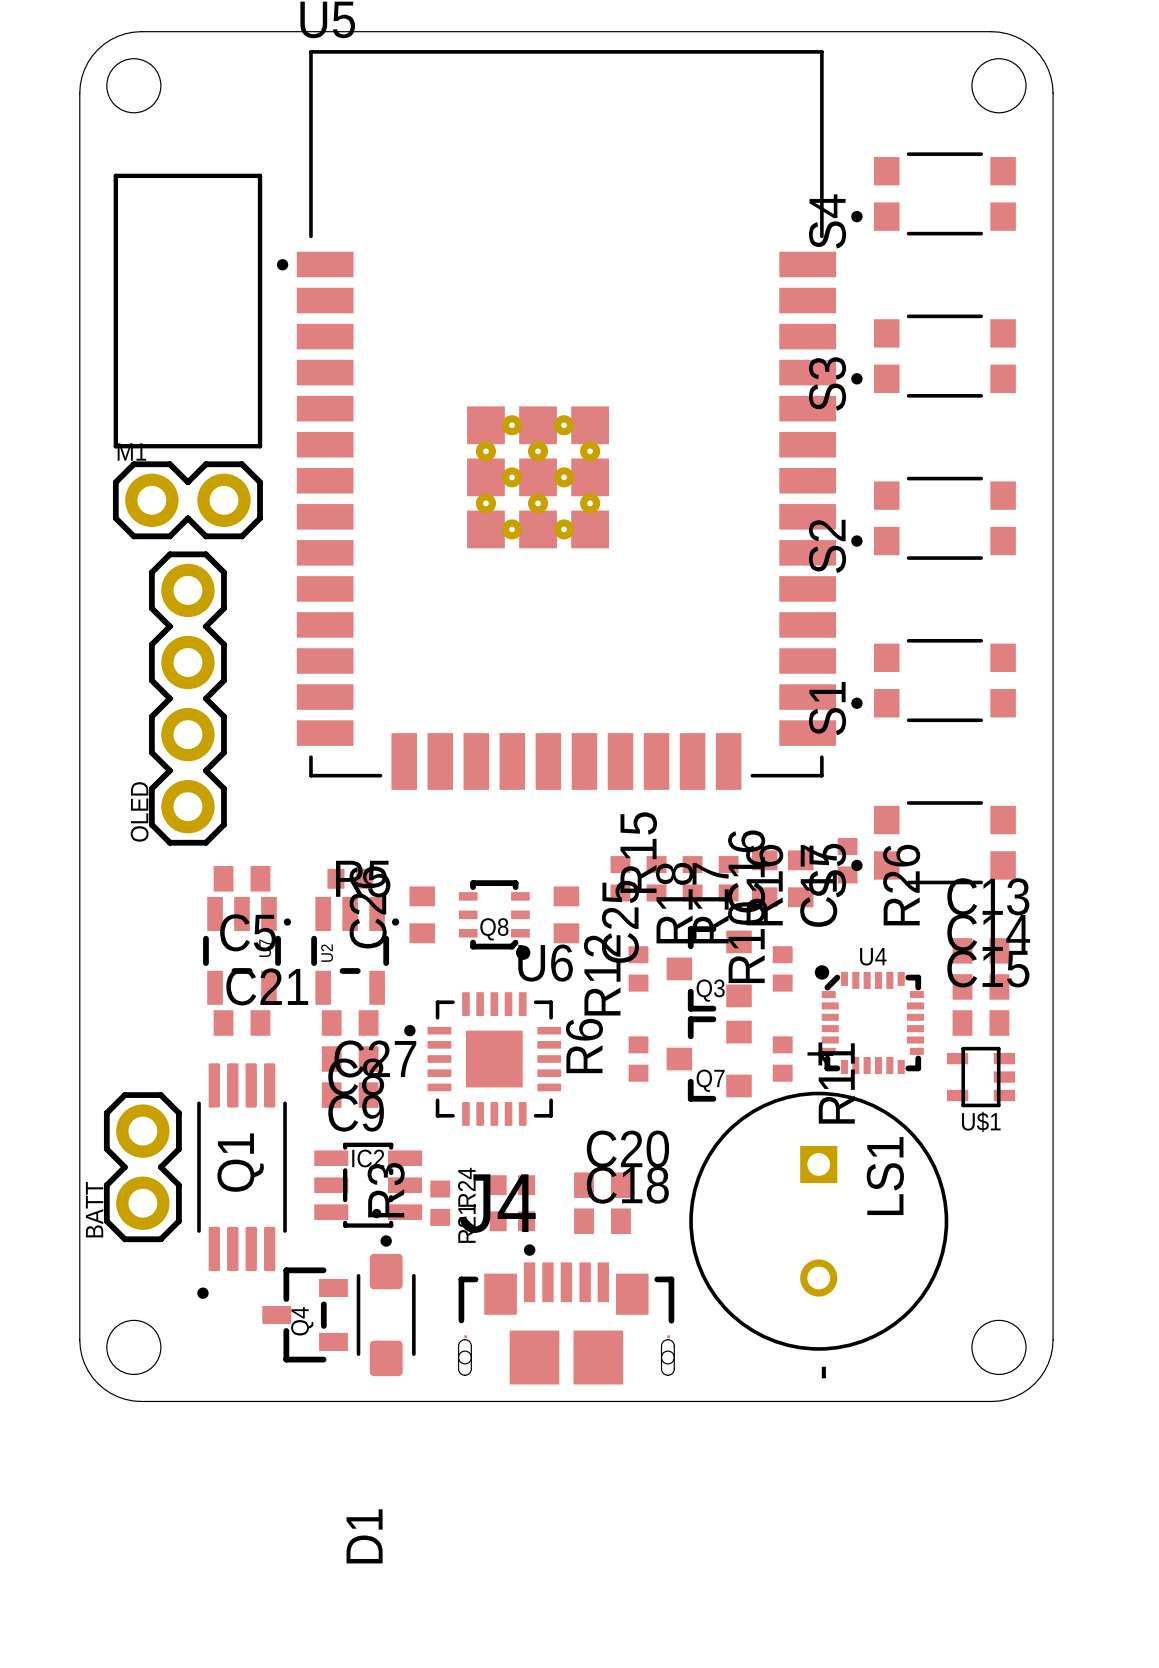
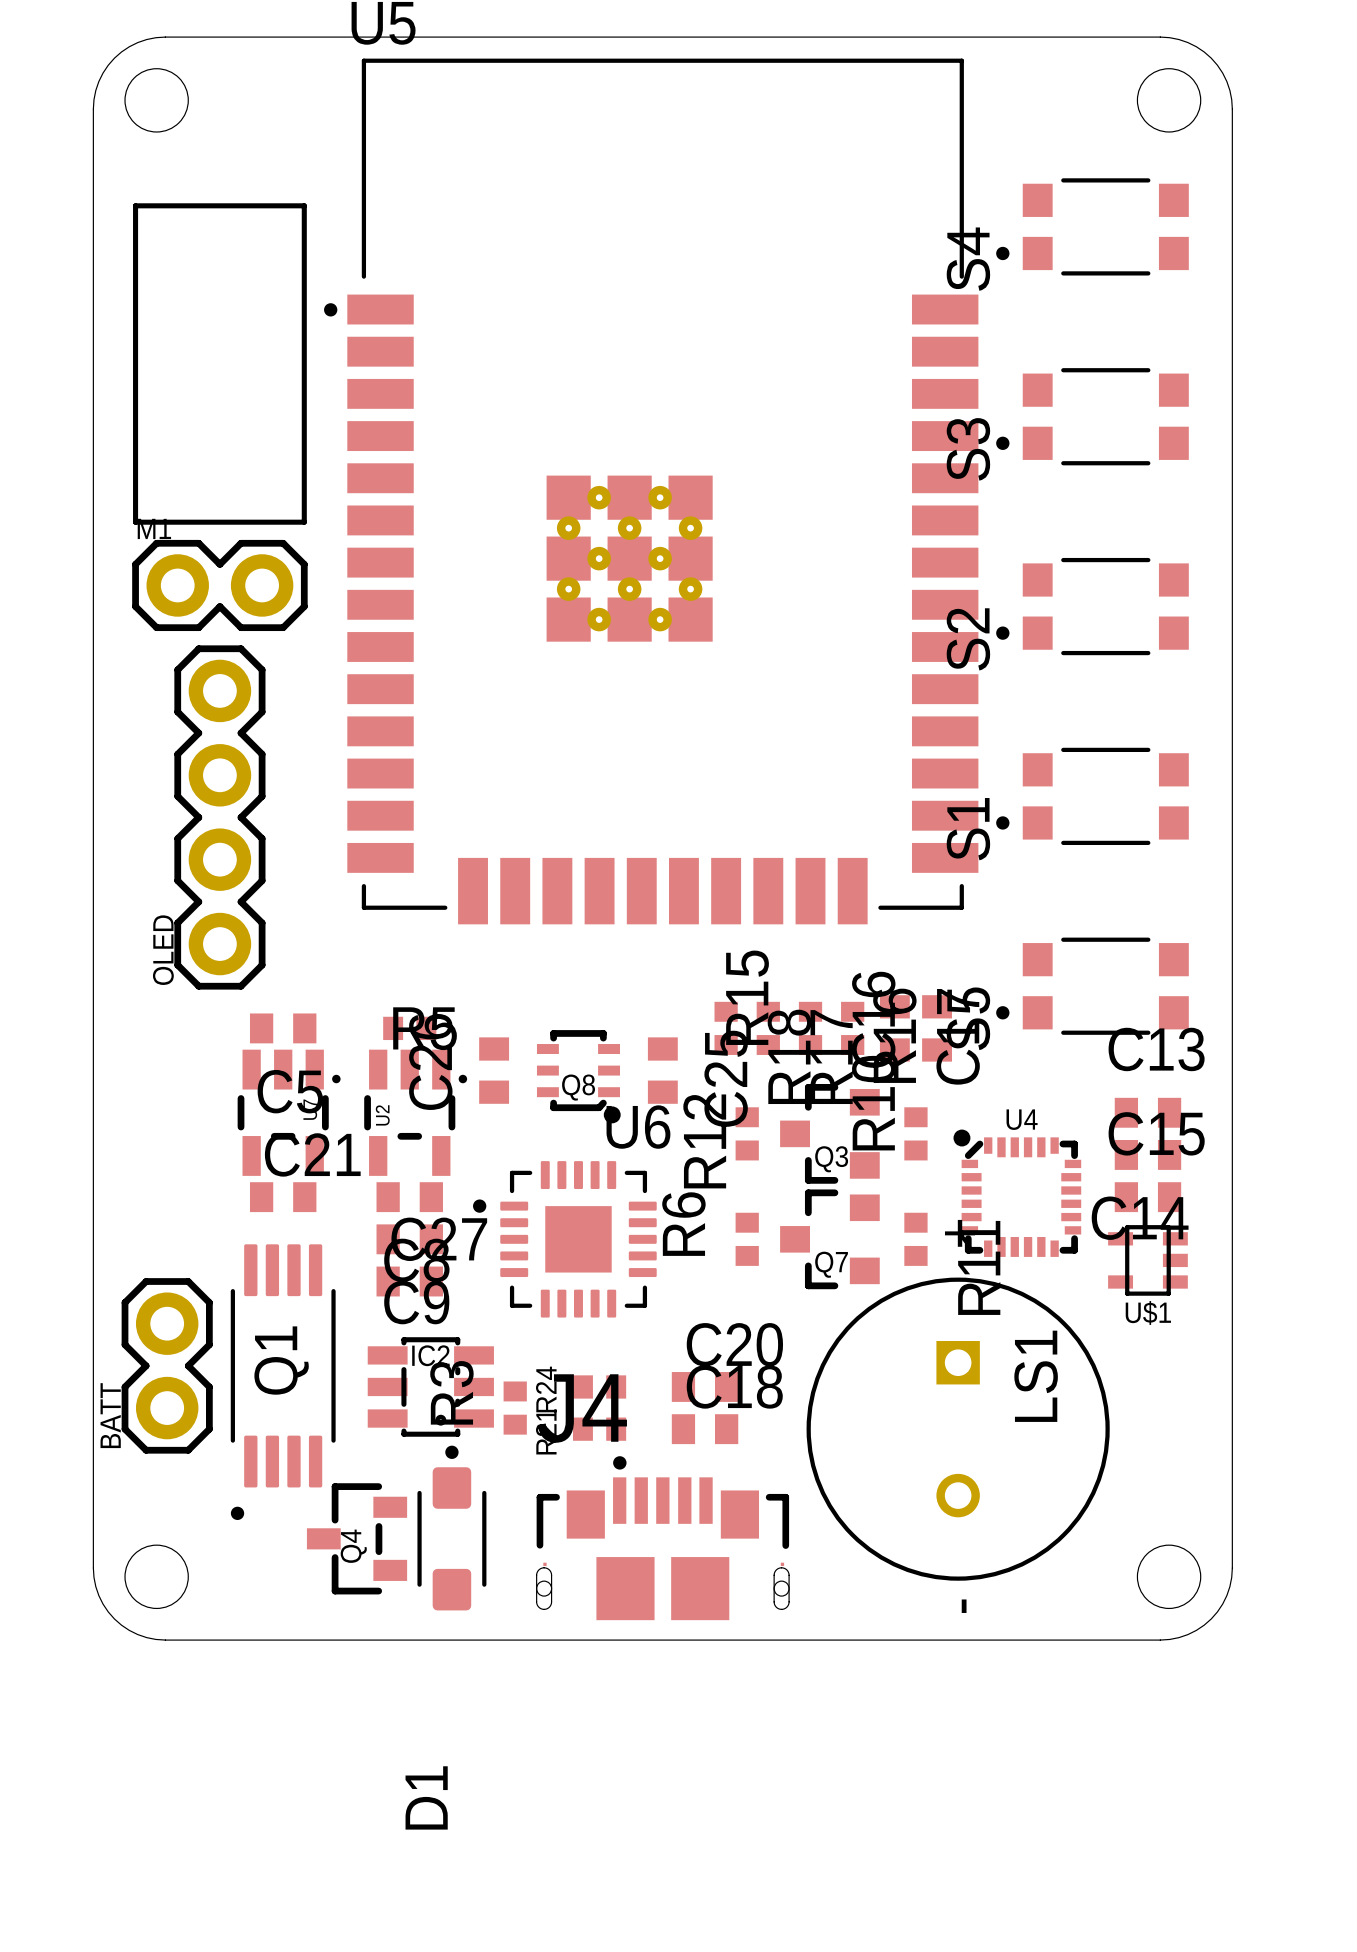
R26: (847, 860) -> none
C14 name position: C14 (988, 932) -> C14 (1140, 1218)

